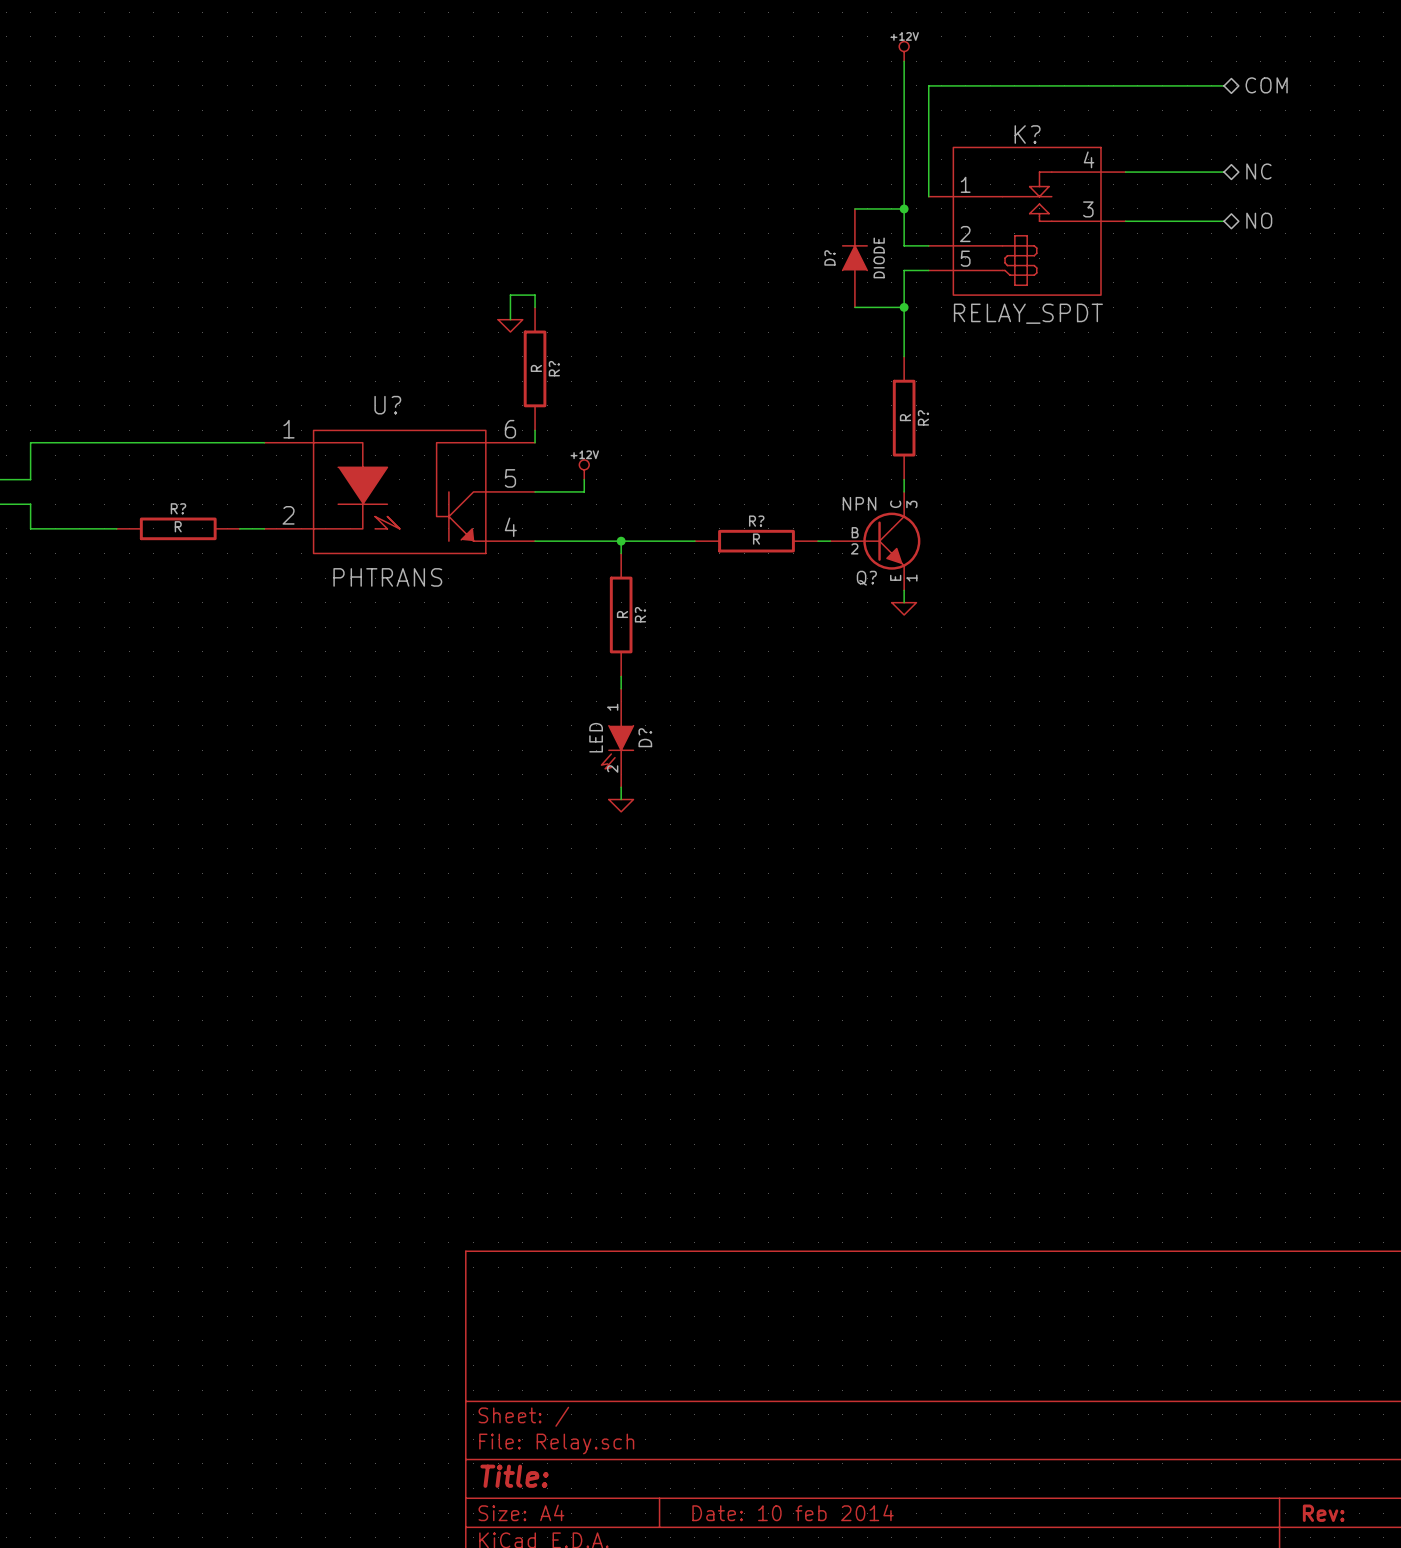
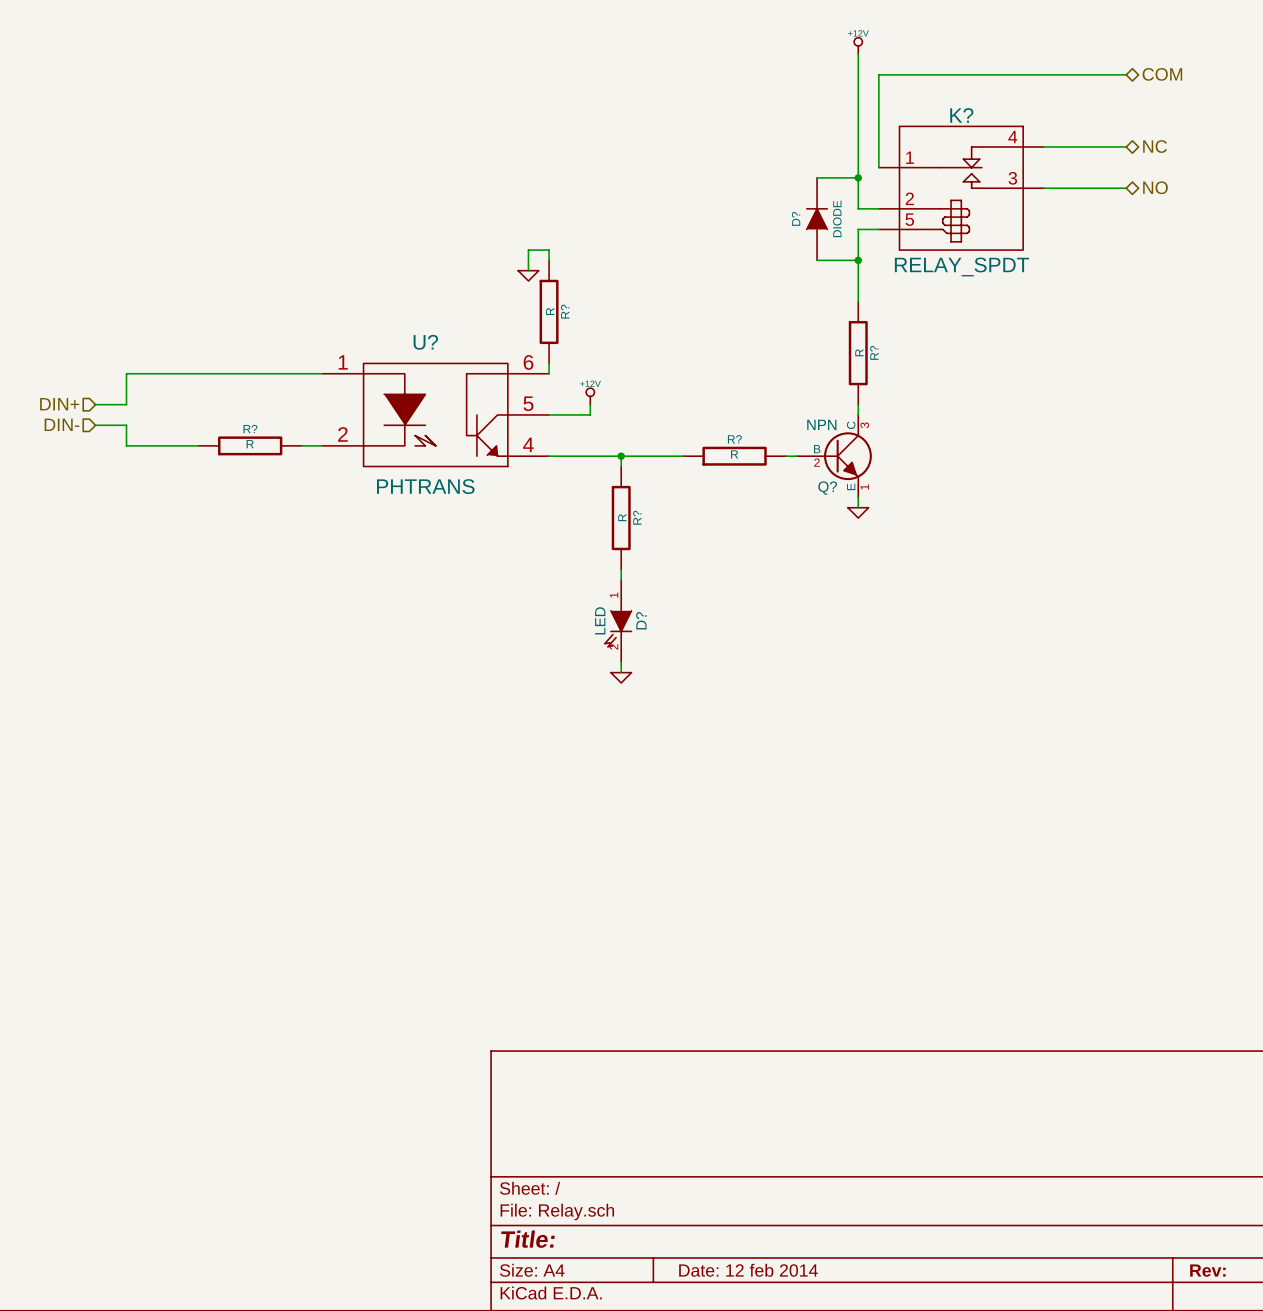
title block: Date: 10 feb 2014 (793, 1512) -> Date: 12 feb 2014 (748, 1270)

